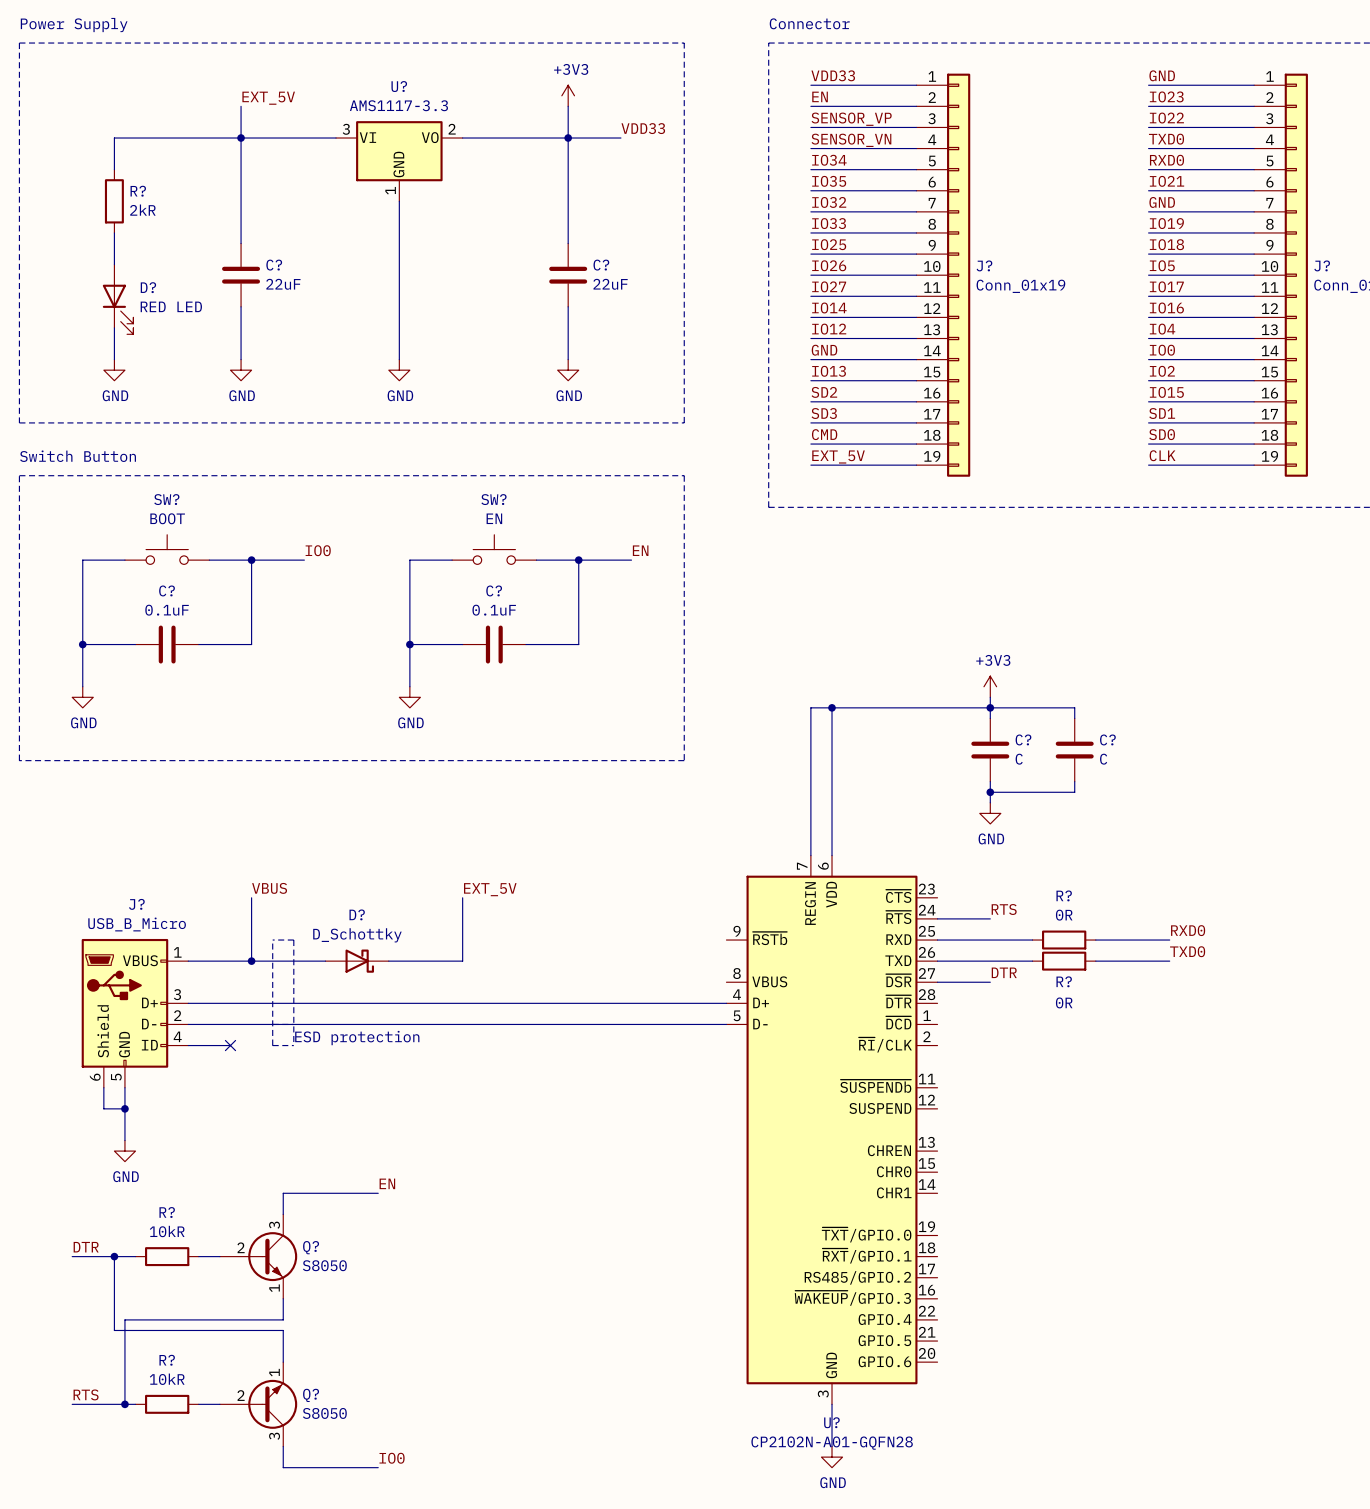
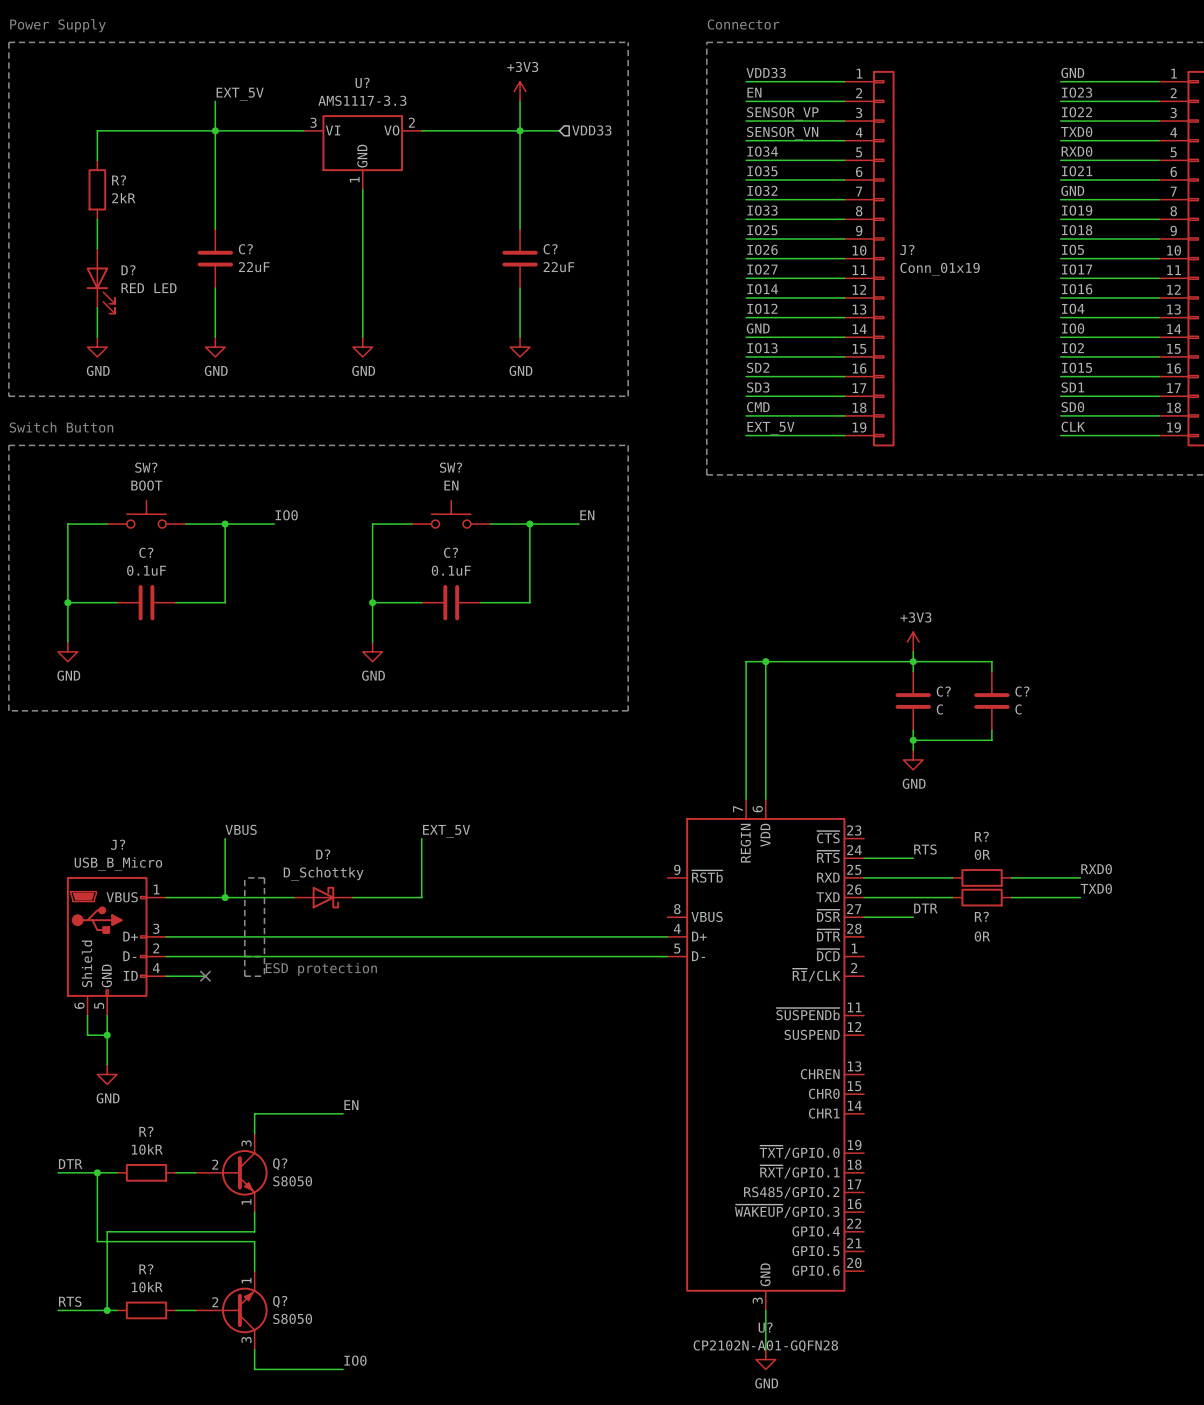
label: VDD33 (643, 128) -> none
hierarchical label: none -> VDD33 (591, 130)
wire: (610, 138) (620, 138) -> none

